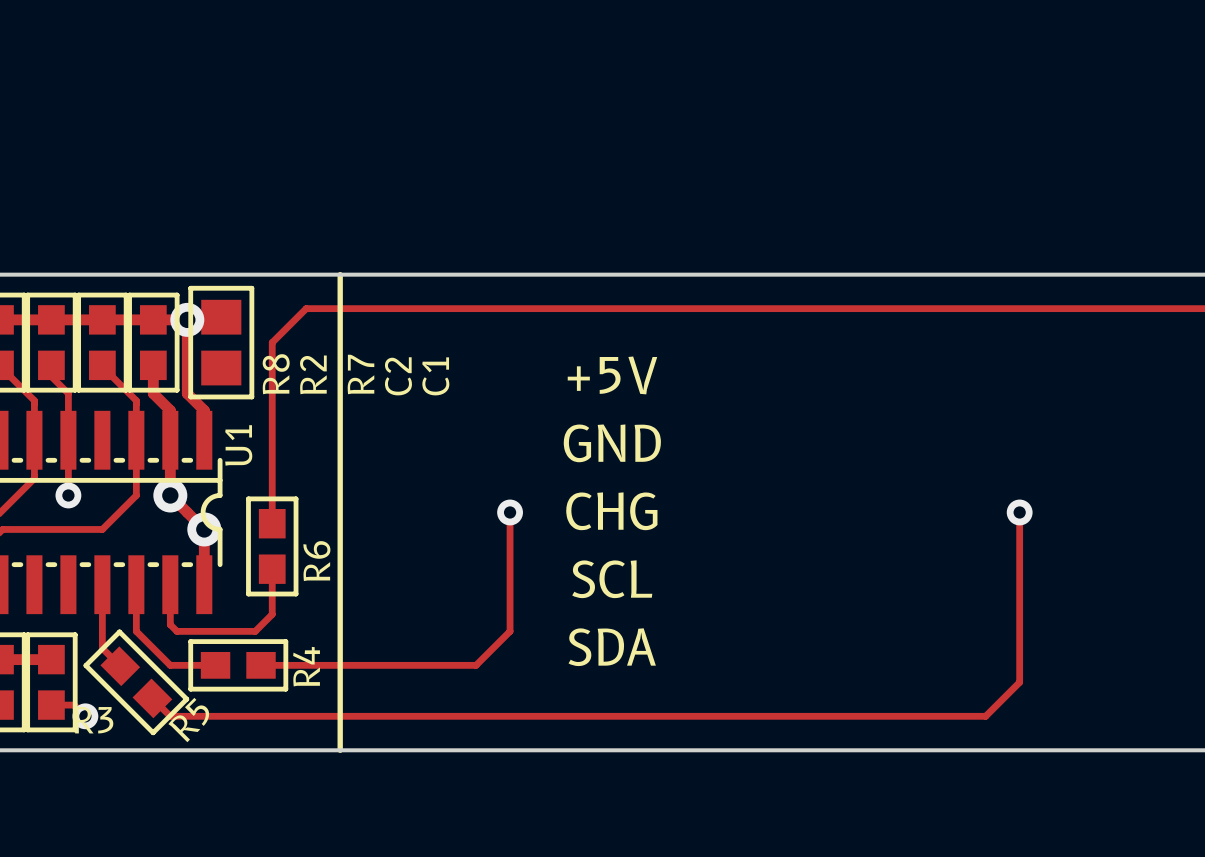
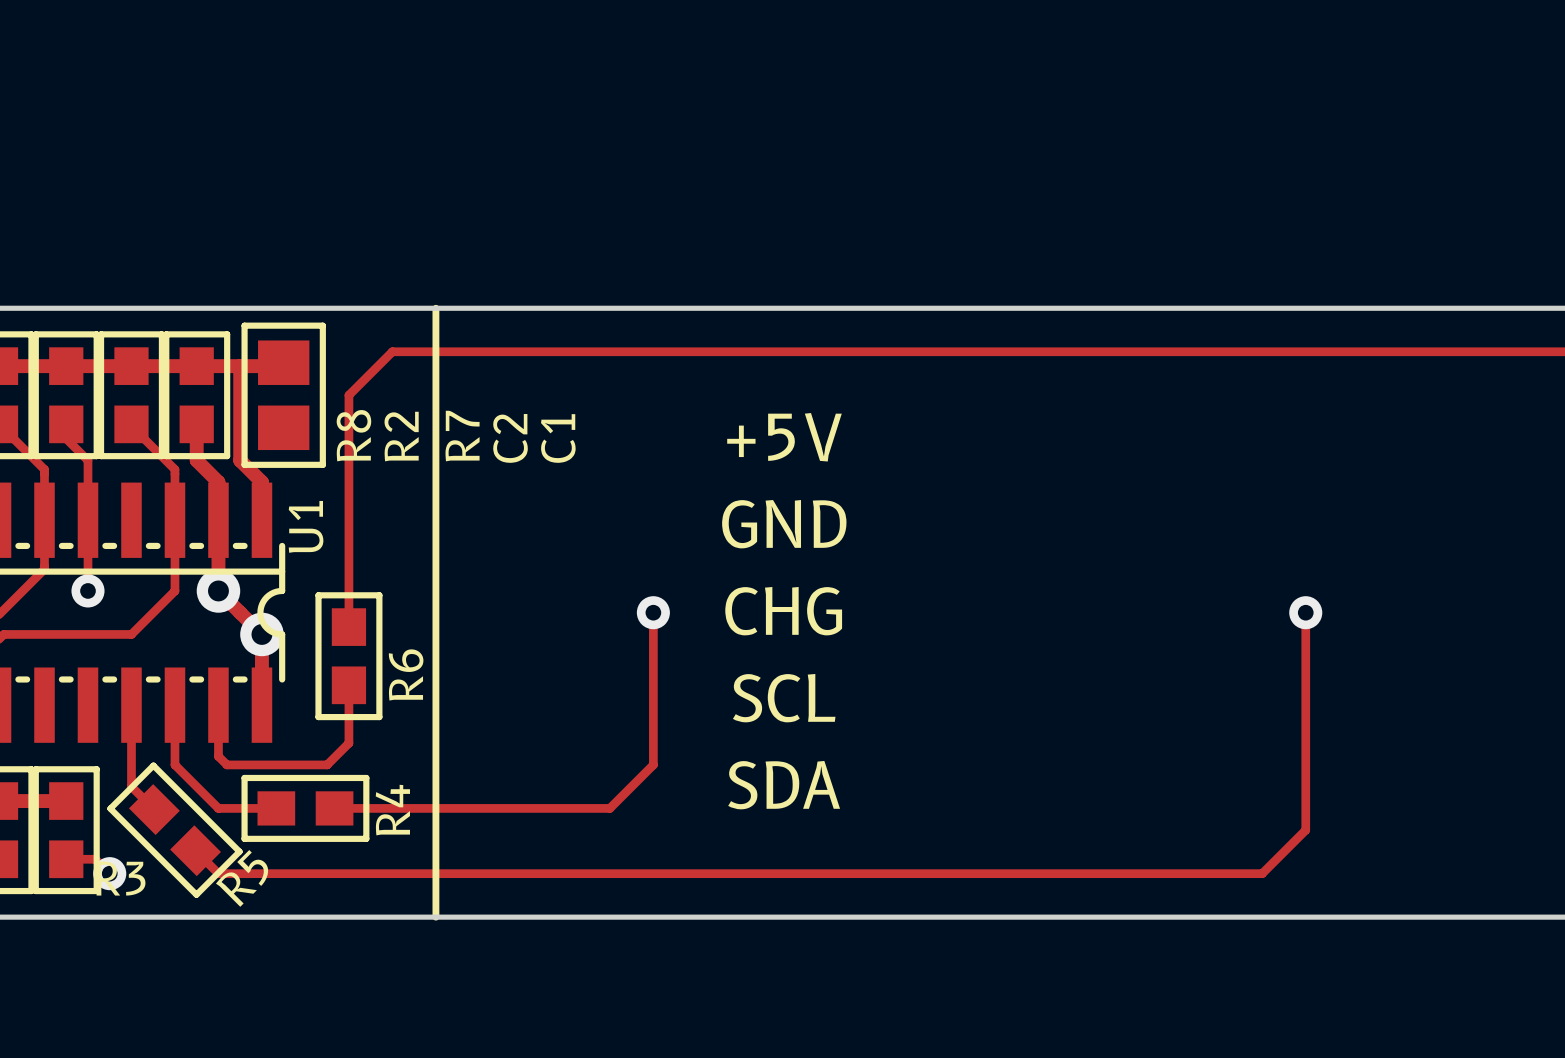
via: (187, 319) -> none

